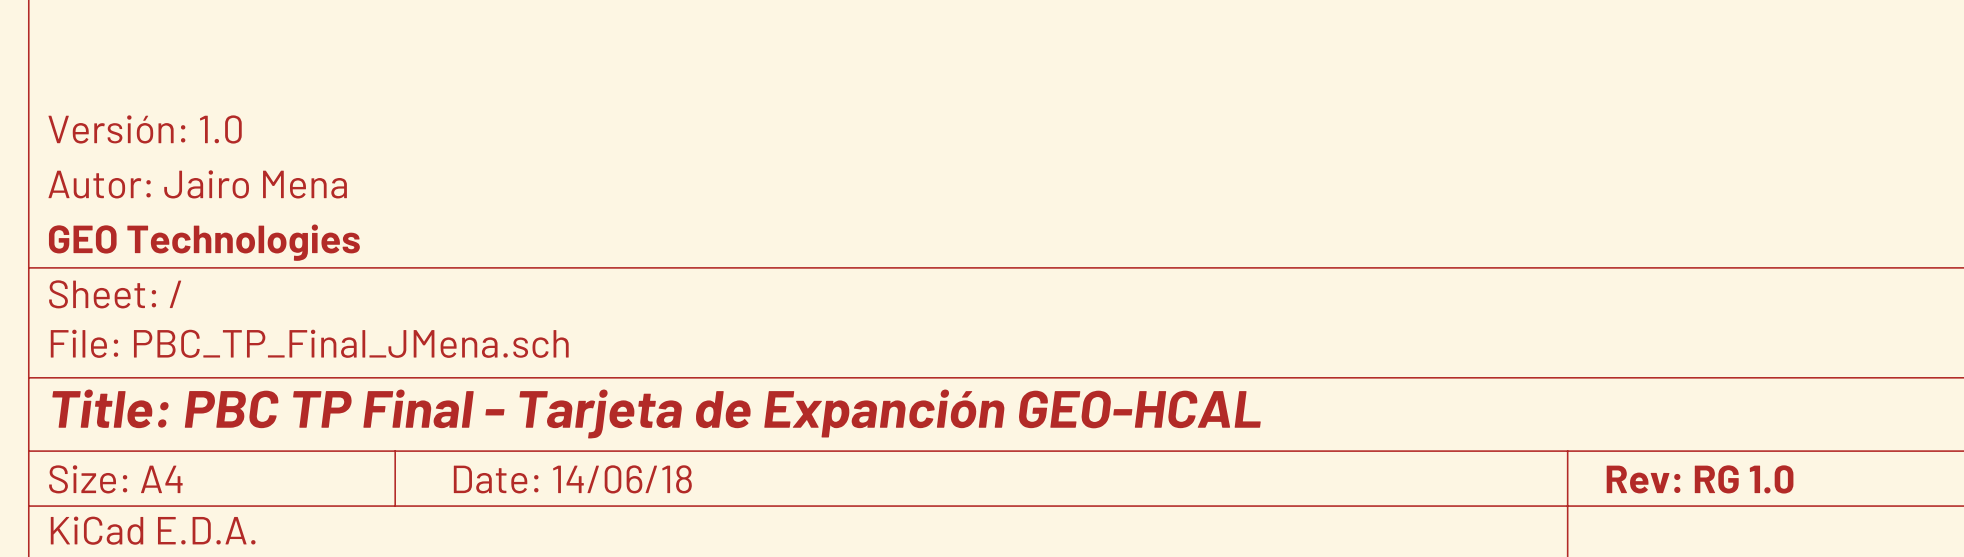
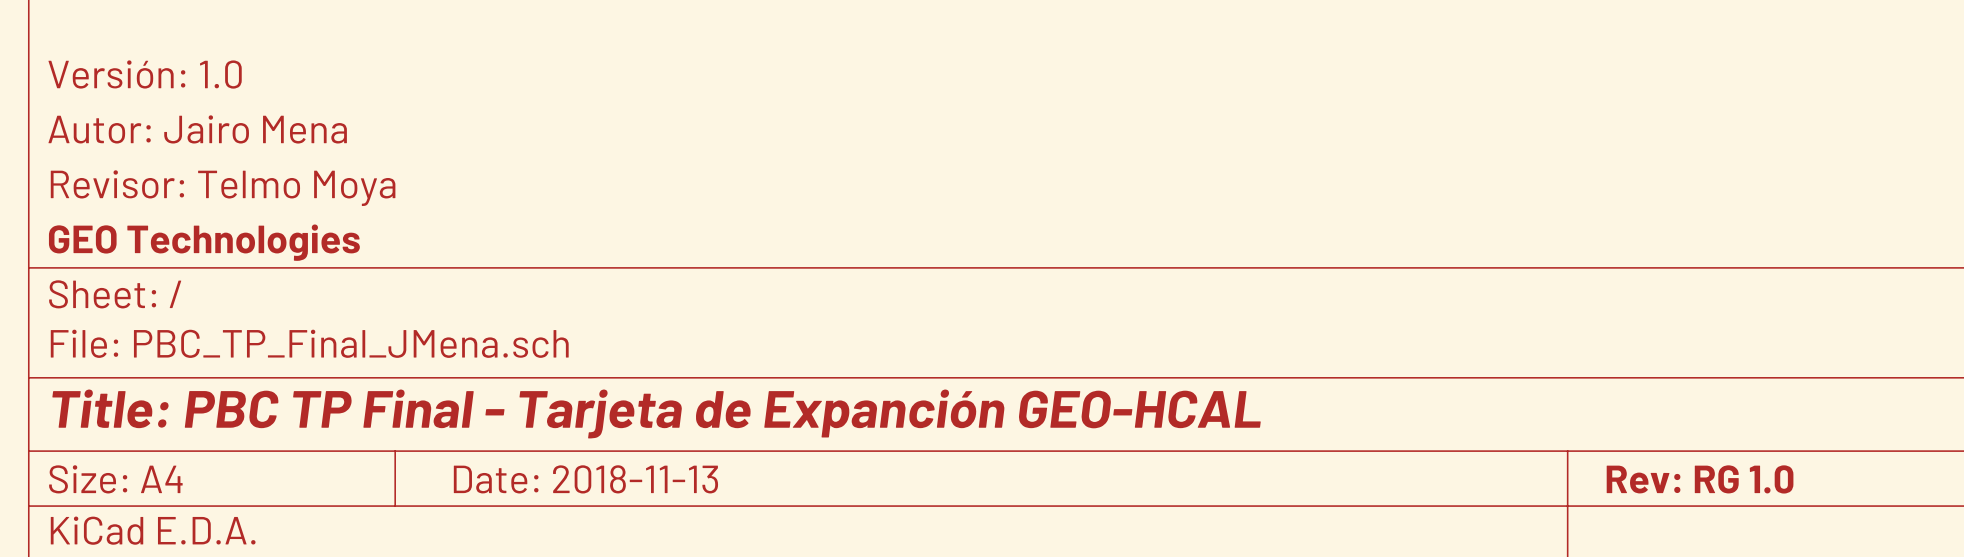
title block: none -> Versión: 1.0 (145, 74)
title block: Versión: 1.0 (145, 129) -> Autor: Jairo Mena (197, 129)
title block: Autor: Jairo Mena (197, 184) -> Revisor: Telmo Moya (223, 188)
title block: Date: 14/06/18 (572, 479) -> Date: 2018-11-13 (585, 479)

